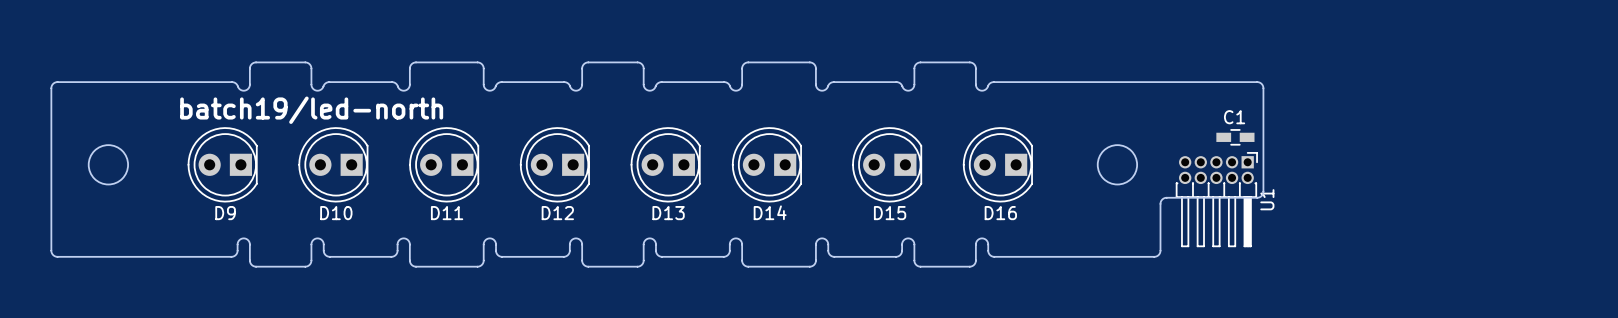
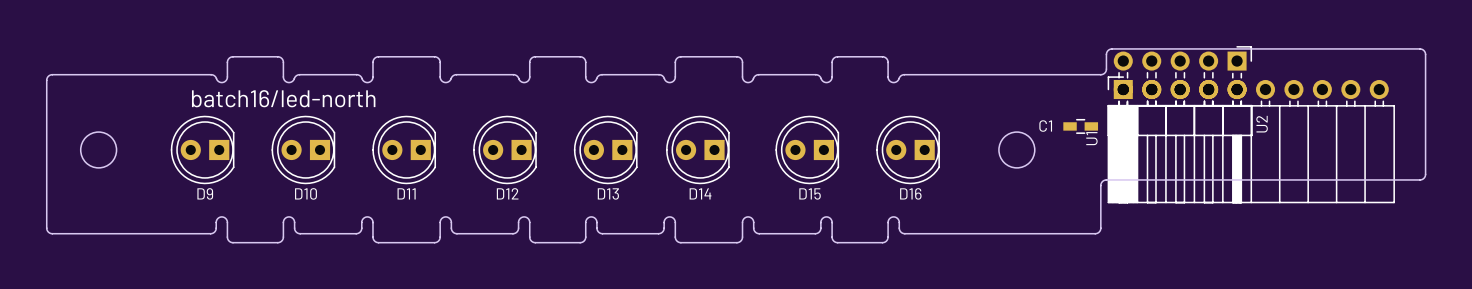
board edge: (1209, 82) (1258, 82) (1262, 85) (1263, 191) (1261, 195) (1257, 197) -> (1100, 74) (1106, 71) (1106, 53) (1111, 49) (1419, 48) (1425, 52) (1425, 174) (1422, 179) (1144, 179)
text: batch19/led-north (311, 110) -> batch16/led-north (283, 98)
C1 name position: C1 (1234, 117) -> C1 (1045, 126)
C1 position: (1235, 137) -> (1080, 126)
U2: none -> (1180, 124)
U1 footprint: [1175, 152, 1258, 248] -> [1107, 76, 1395, 204]
board edge: (1215, 197) (1166, 197) (1162, 199) (1160, 203) (1160, 251) (1158, 255) (1154, 256) -> (1106, 179) (1100, 184) (1099, 232) (1095, 233) (1050, 233)
U1 name position: U1 (1267, 199) -> U1 (1091, 138)

